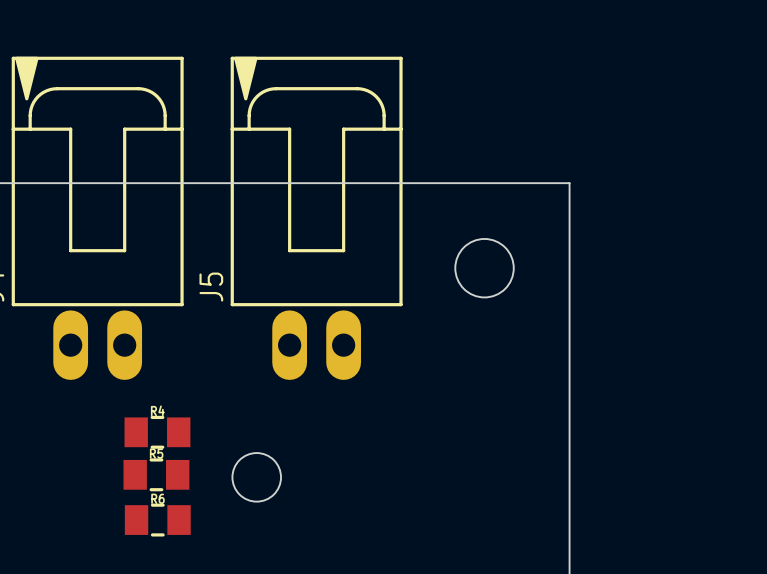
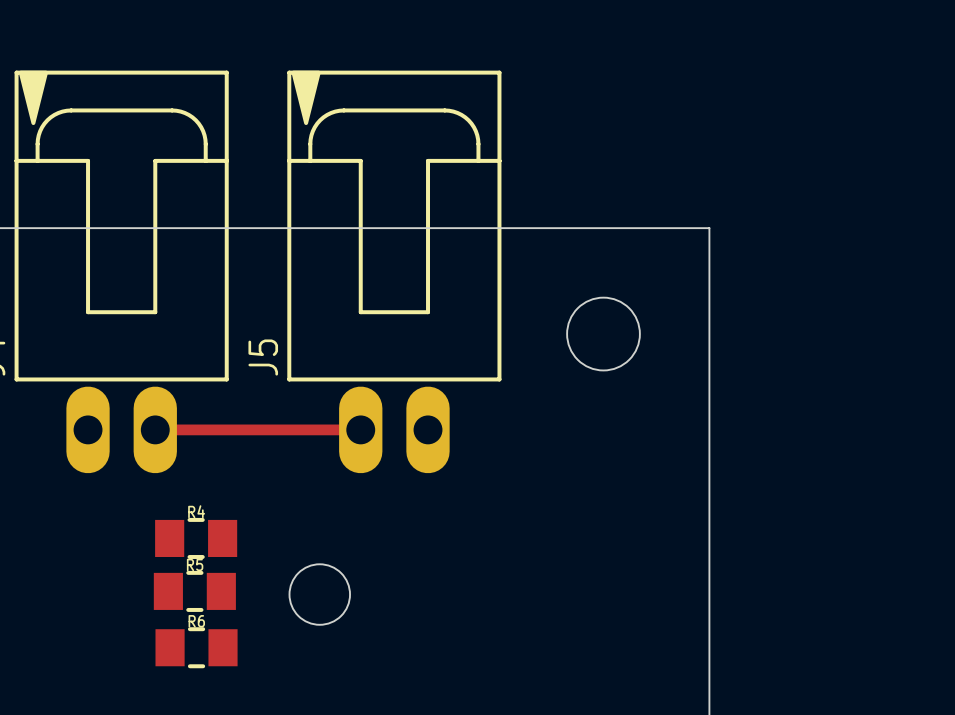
top track: none -> (155, 429) (360, 429)

